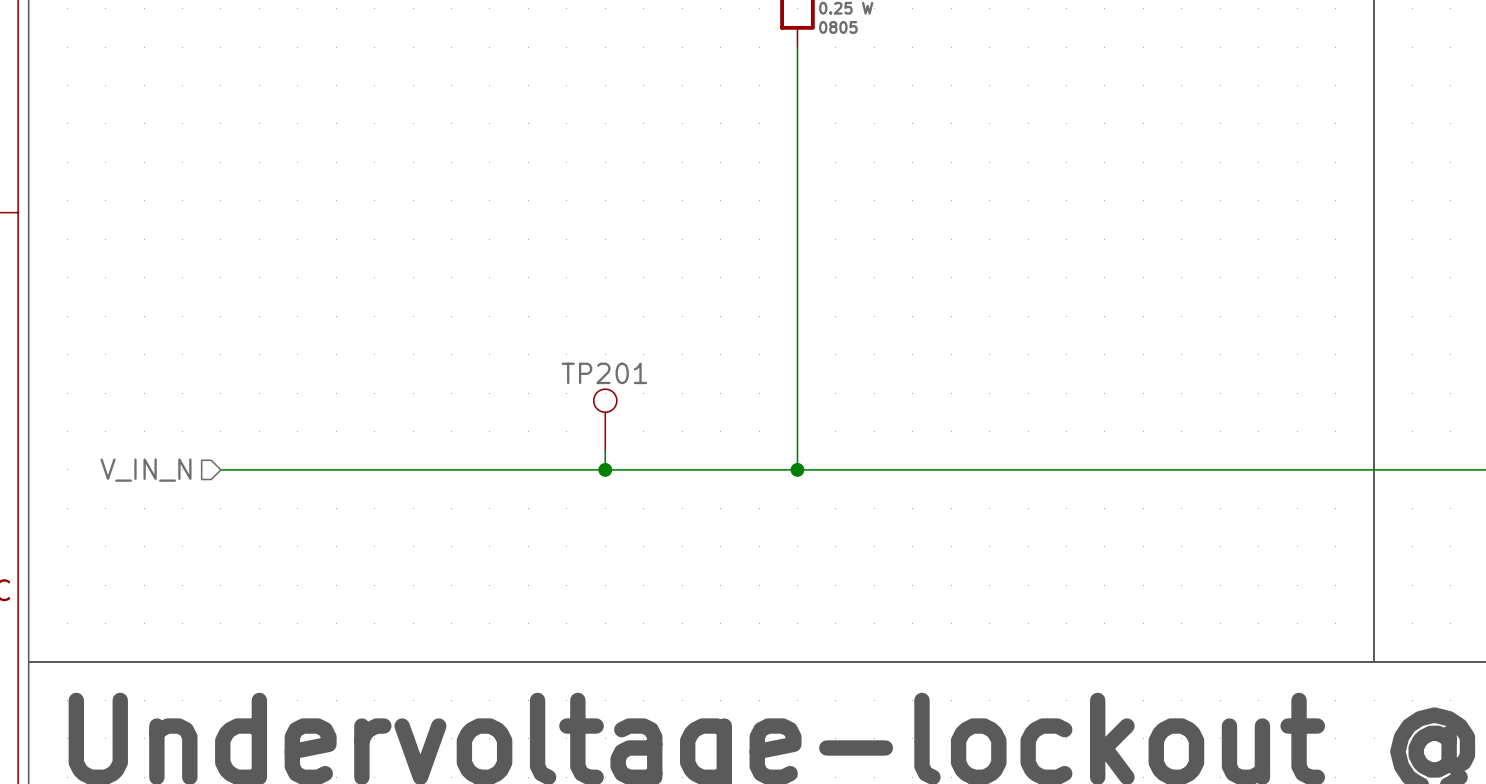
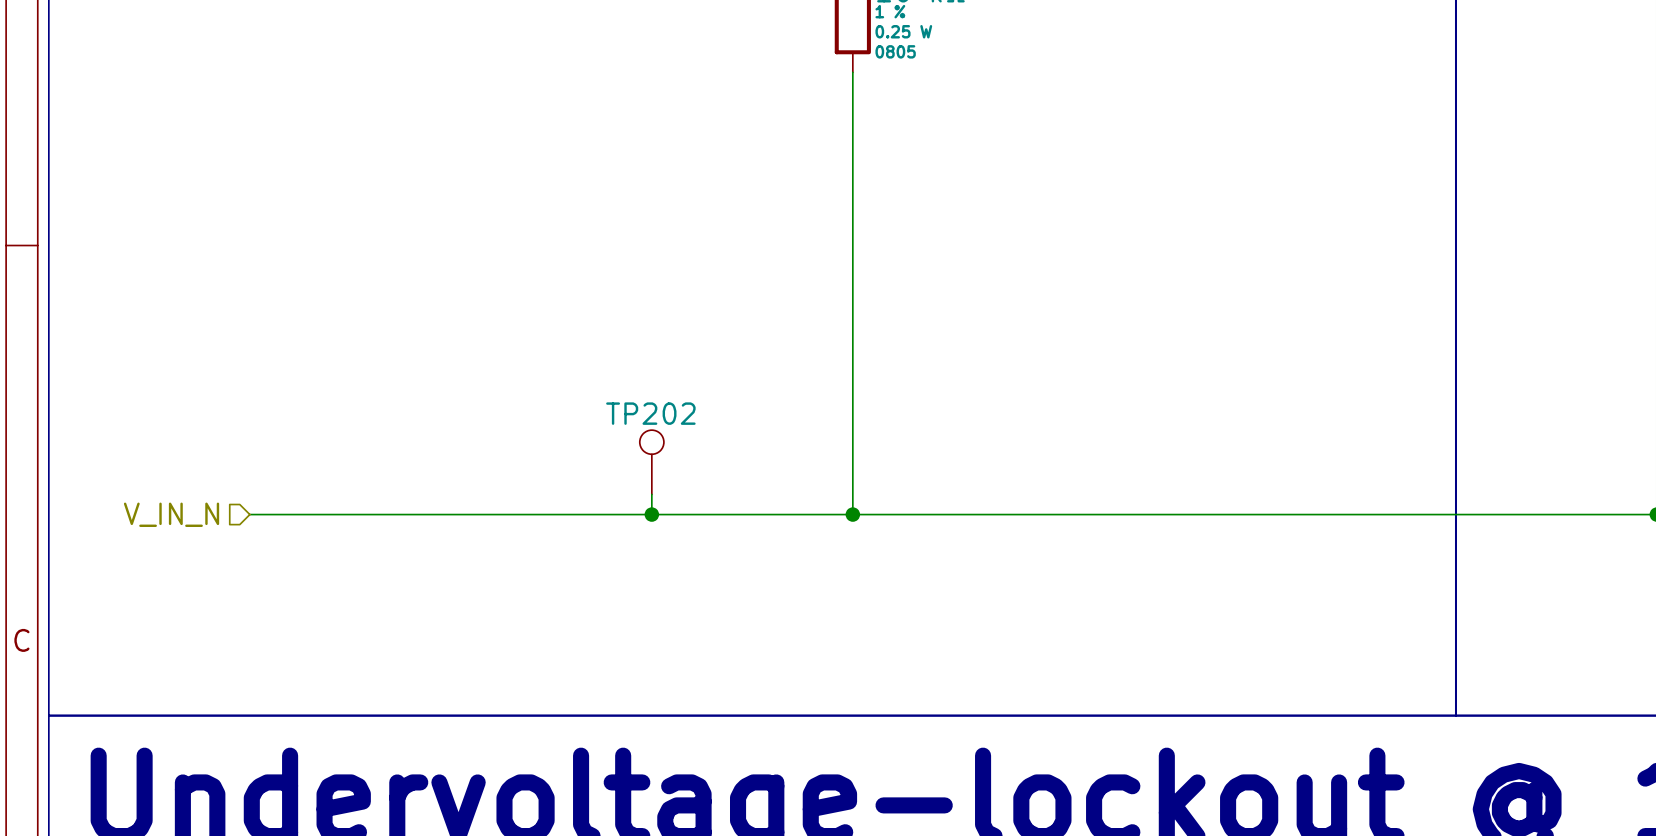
TP201 name: TP201 (604, 373) -> TP202 (650, 413)

